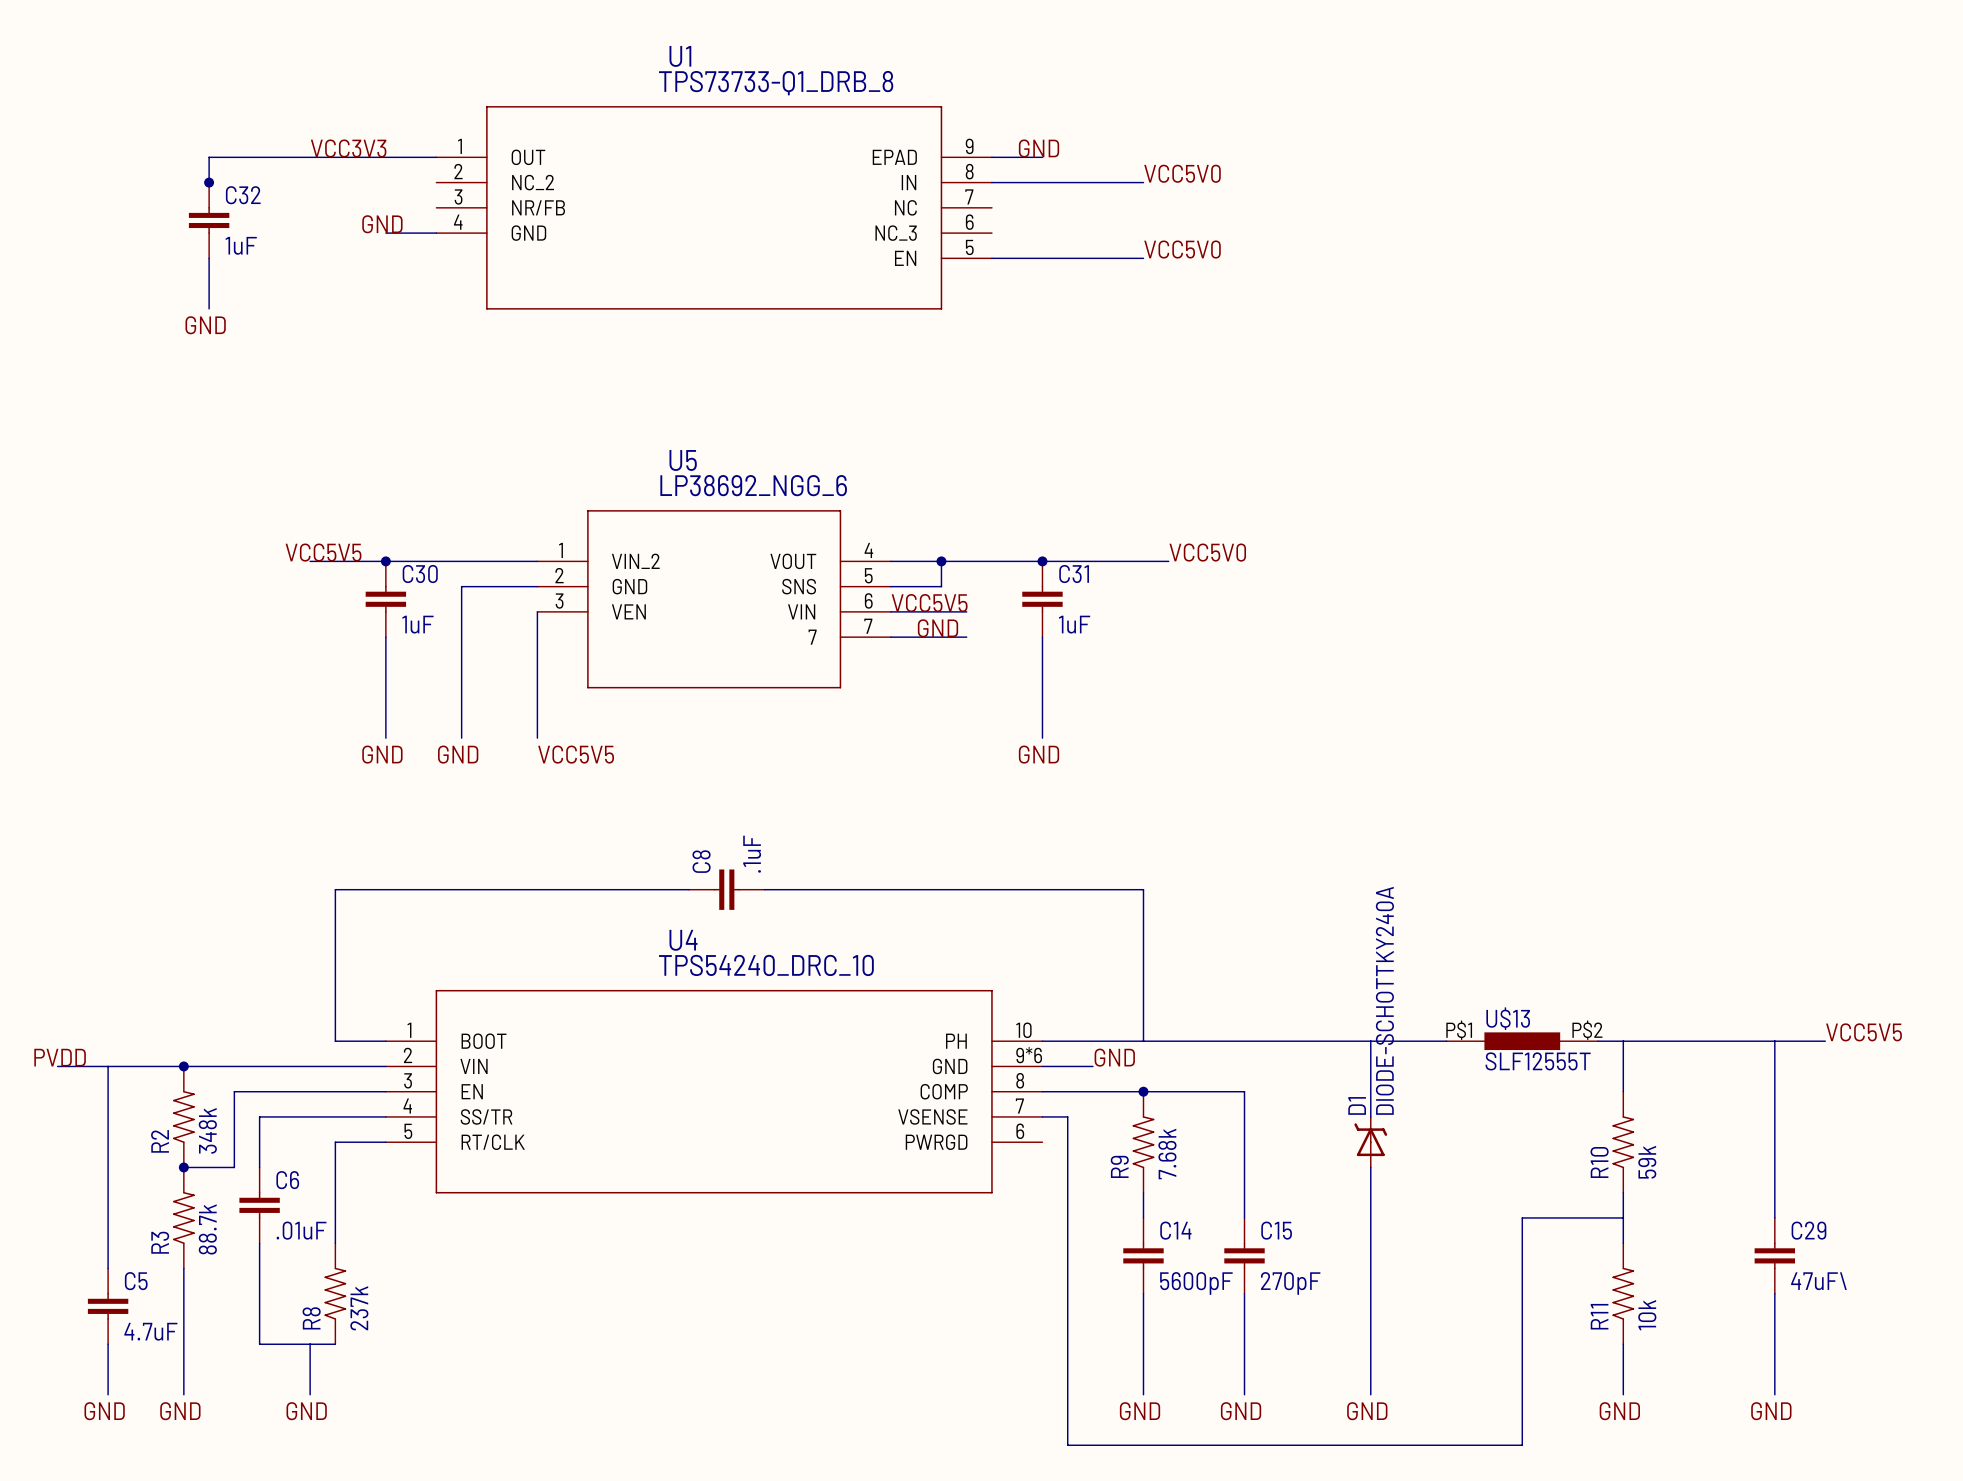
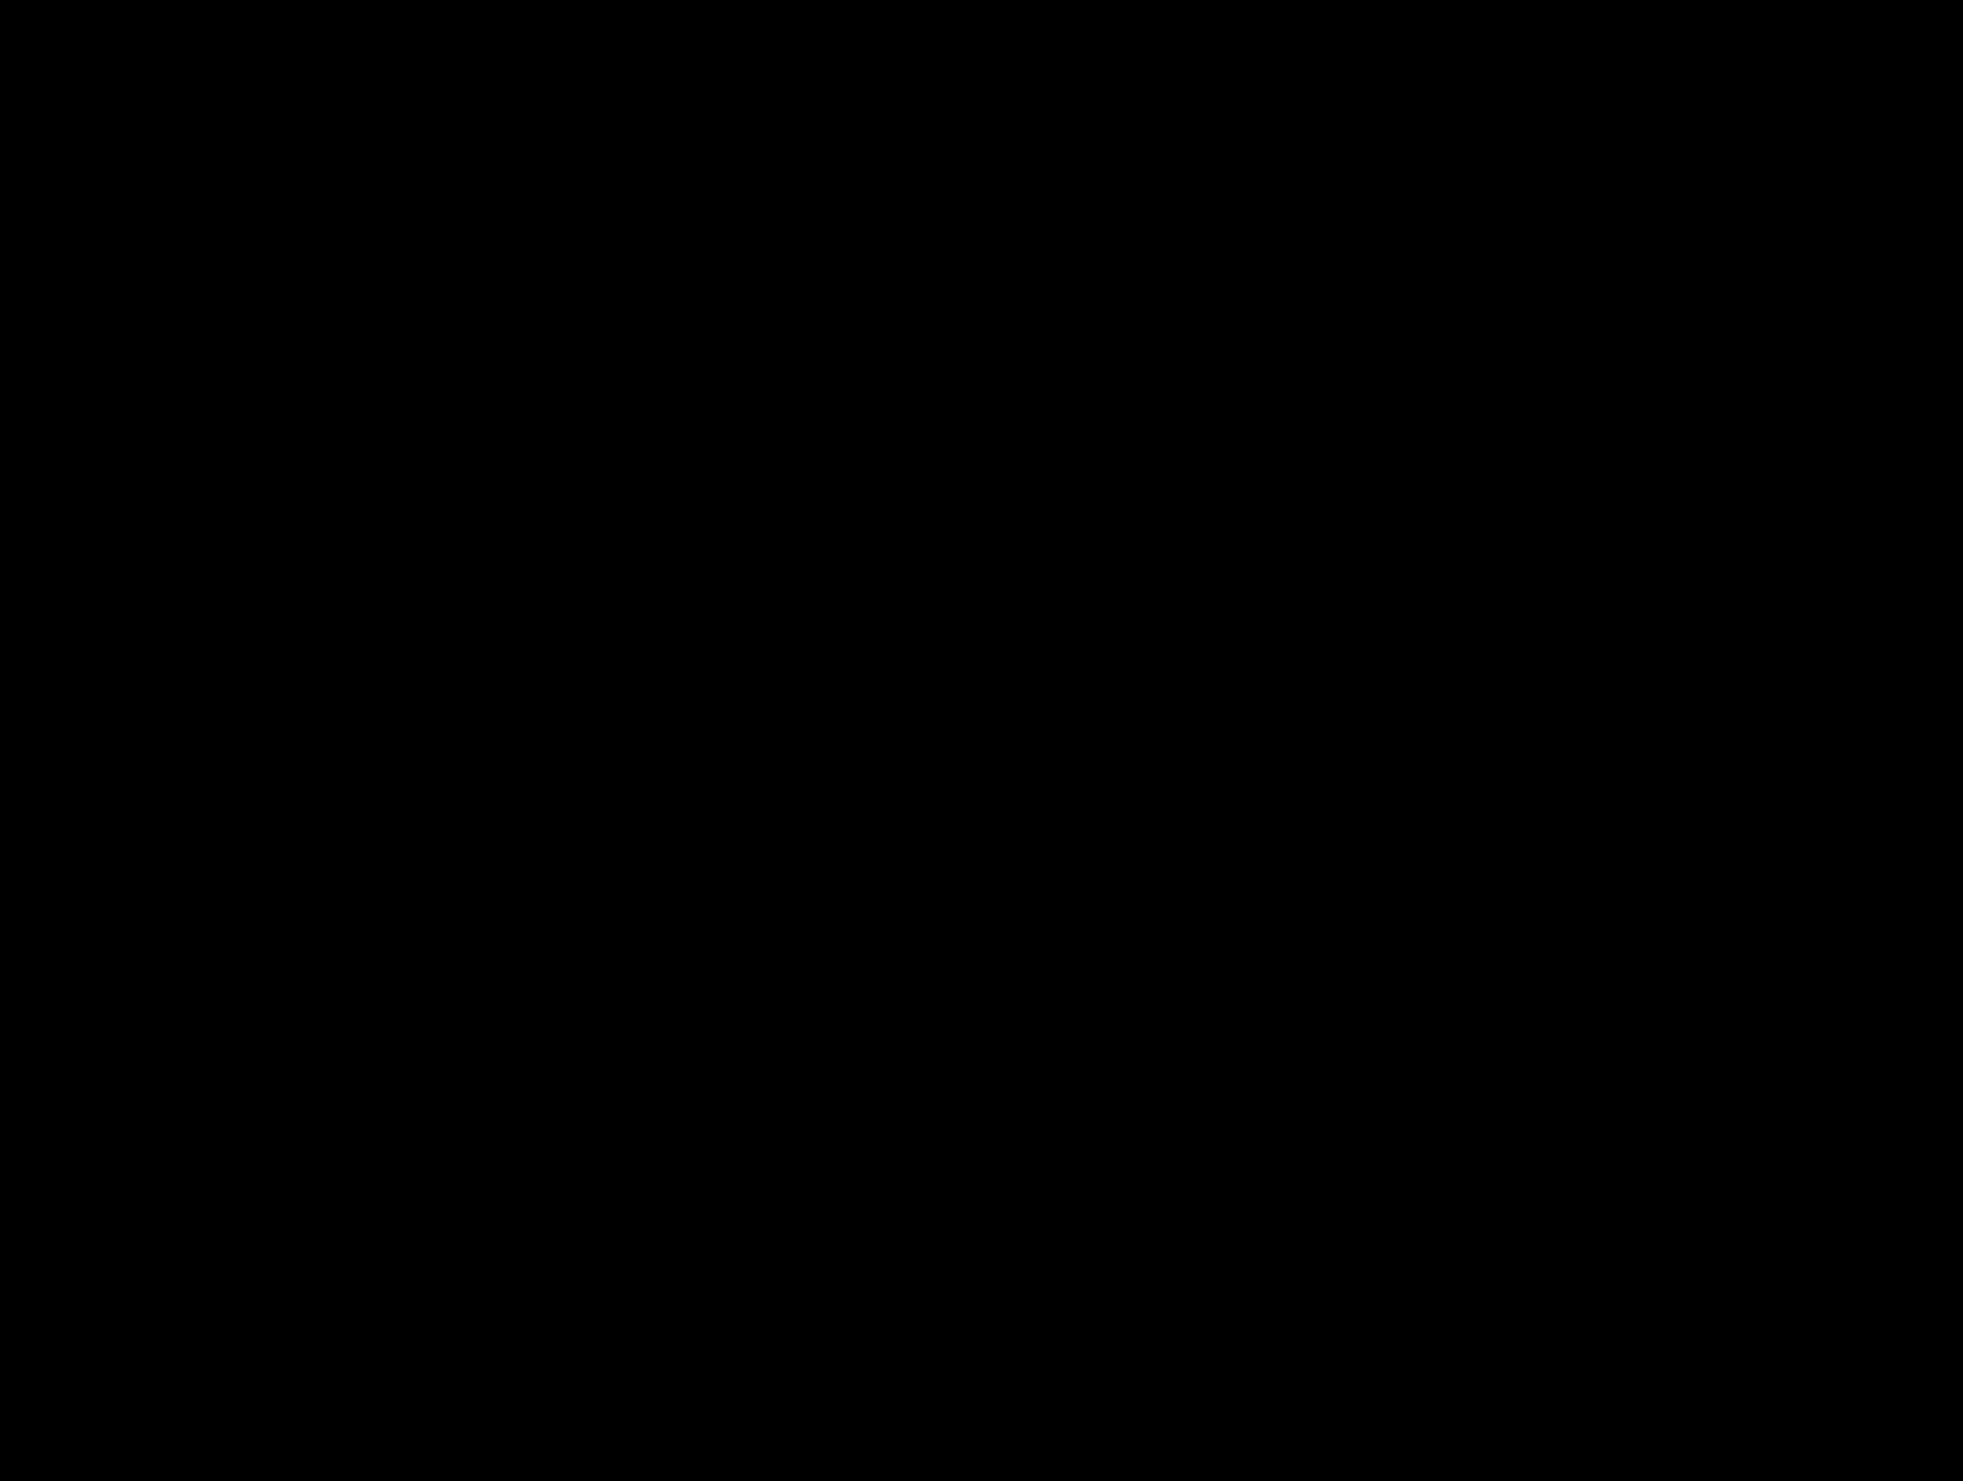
label: VCC3V3 (348, 148) -> none
label: GND (1039, 148) -> none
wire: (436, 157) (209, 157) (209, 182) -> none
wire: (991, 157) (1042, 157) -> none
label: VCC5V0 (1182, 173) -> none
junction: (209, 182) -> none
wire: (991, 182) (1143, 182) -> none
U1: TPS73733-Q1_DRB_8 (714, 207) -> none
C32: 1uF (209, 220) -> none
label: GND (382, 224) -> none
wire: (385, 233) (436, 233) -> none
label: VCC5V0 (1182, 249) -> none
wire: (209, 258) (209, 308) -> none
wire: (991, 258) (1143, 258) -> none
label: GND (205, 325) -> none
label: VCC5V5 (323, 552) -> none
label: VCC5V0 (1207, 552) -> none
wire: (310, 561) (537, 561) -> none
junction: (385, 561) -> none
wire: (890, 561) (1168, 561) -> none
wire: (941, 561) (941, 586) (890, 586) -> none
junction: (941, 561) -> none
junction: (1042, 561) -> none
wire: (537, 586) (461, 586) (461, 738) -> none
C30: 1uF (385, 599) -> none
U5: LP38692_NGG_6 (714, 599) -> none
C31: 1uF (1042, 599) -> none
label: VCC5V5 (929, 603) -> none
wire: (537, 611) (537, 738) -> none
wire: (890, 611) (966, 611) -> none
label: GND (937, 628) -> none
wire: (385, 637) (385, 738) -> none
wire: (890, 637) (966, 637) -> none
wire: (1042, 637) (1042, 738) -> none
label: GND (382, 754) -> none
label: GND (458, 754) -> none
label: VCC5V5 (576, 754) -> none
label: GND (1039, 754) -> none
wire: (688, 889) (335, 889) (335, 1041) (385, 1041) -> none
C8: .1uF (726, 889) -> none
wire: (764, 889) (1143, 889) (1143, 1041) -> none
label: VCC5V5 (1864, 1032) -> none
wire: (1042, 1041) (1446, 1041) -> none
wire: (1370, 1041) (1370, 1116) -> none
U$13: SLF12555T (1522, 1041) -> none
wire: (1598, 1041) (1825, 1041) -> none
wire: (1623, 1041) (1623, 1091) -> none
wire: (1774, 1041) (1774, 1217) -> none
label: PVDD (60, 1057) -> none
label: GND (1114, 1057) -> none
wire: (57, 1066) (385, 1066) -> none
wire: (108, 1066) (108, 1268) -> none
junction: (183, 1066) -> none
wire: (1042, 1066) (1092, 1066) -> none
wire: (385, 1091) (234, 1091) (234, 1167) (183, 1167) -> none
U4: TPS54240_DRC_10 (714, 1091) -> none
wire: (1042, 1091) (1244, 1091) (1244, 1217) -> none
junction: (1143, 1091) -> none
R2: 348k (183, 1116) -> none
wire: (385, 1116) (259, 1116) (259, 1167) -> none
wire: (1042, 1116) (1067, 1116) (1067, 1445) (1522, 1445) (1522, 1217) (1623, 1217) -> none
wire: (385, 1142) (335, 1142) (335, 1243) -> none
R9: 7.68k (1143, 1142) -> none
D1: DIODE-SCHOTTKY240A (1370, 1142) -> none
R10: 59k (1623, 1142) -> none
junction: (183, 1167) -> none
wire: (1370, 1167) (1370, 1394) -> none
wire: (1143, 1192) (1143, 1217) -> none
wire: (1623, 1192) (1623, 1243) -> none
C6: .01uF (259, 1205) -> none
R3: 88.7k (183, 1217) -> none
wire: (259, 1243) (259, 1344) (335, 1344) -> none
C14: 5600pF (1143, 1255) -> none
C15: 270pF (1244, 1255) -> none
C29: 47uF\ (1774, 1255) -> none
wire: (183, 1268) (183, 1394) -> none
R8: 237k (335, 1293) -> none
wire: (1143, 1293) (1143, 1394) -> none
wire: (1244, 1293) (1244, 1394) -> none
R11: 10k (1623, 1293) -> none
wire: (1774, 1293) (1774, 1394) -> none
C5: 4.7uF (108, 1306) -> none
wire: (108, 1344) (108, 1394) -> none
wire: (310, 1344) (310, 1394) -> none
wire: (1623, 1344) (1623, 1394) -> none
label: GND (104, 1411) -> none
label: GND (180, 1411) -> none
label: GND (306, 1411) -> none
label: GND (1140, 1411) -> none
label: GND (1241, 1411) -> none
label: GND (1367, 1411) -> none
label: GND (1619, 1411) -> none
label: GND (1771, 1411) -> none

